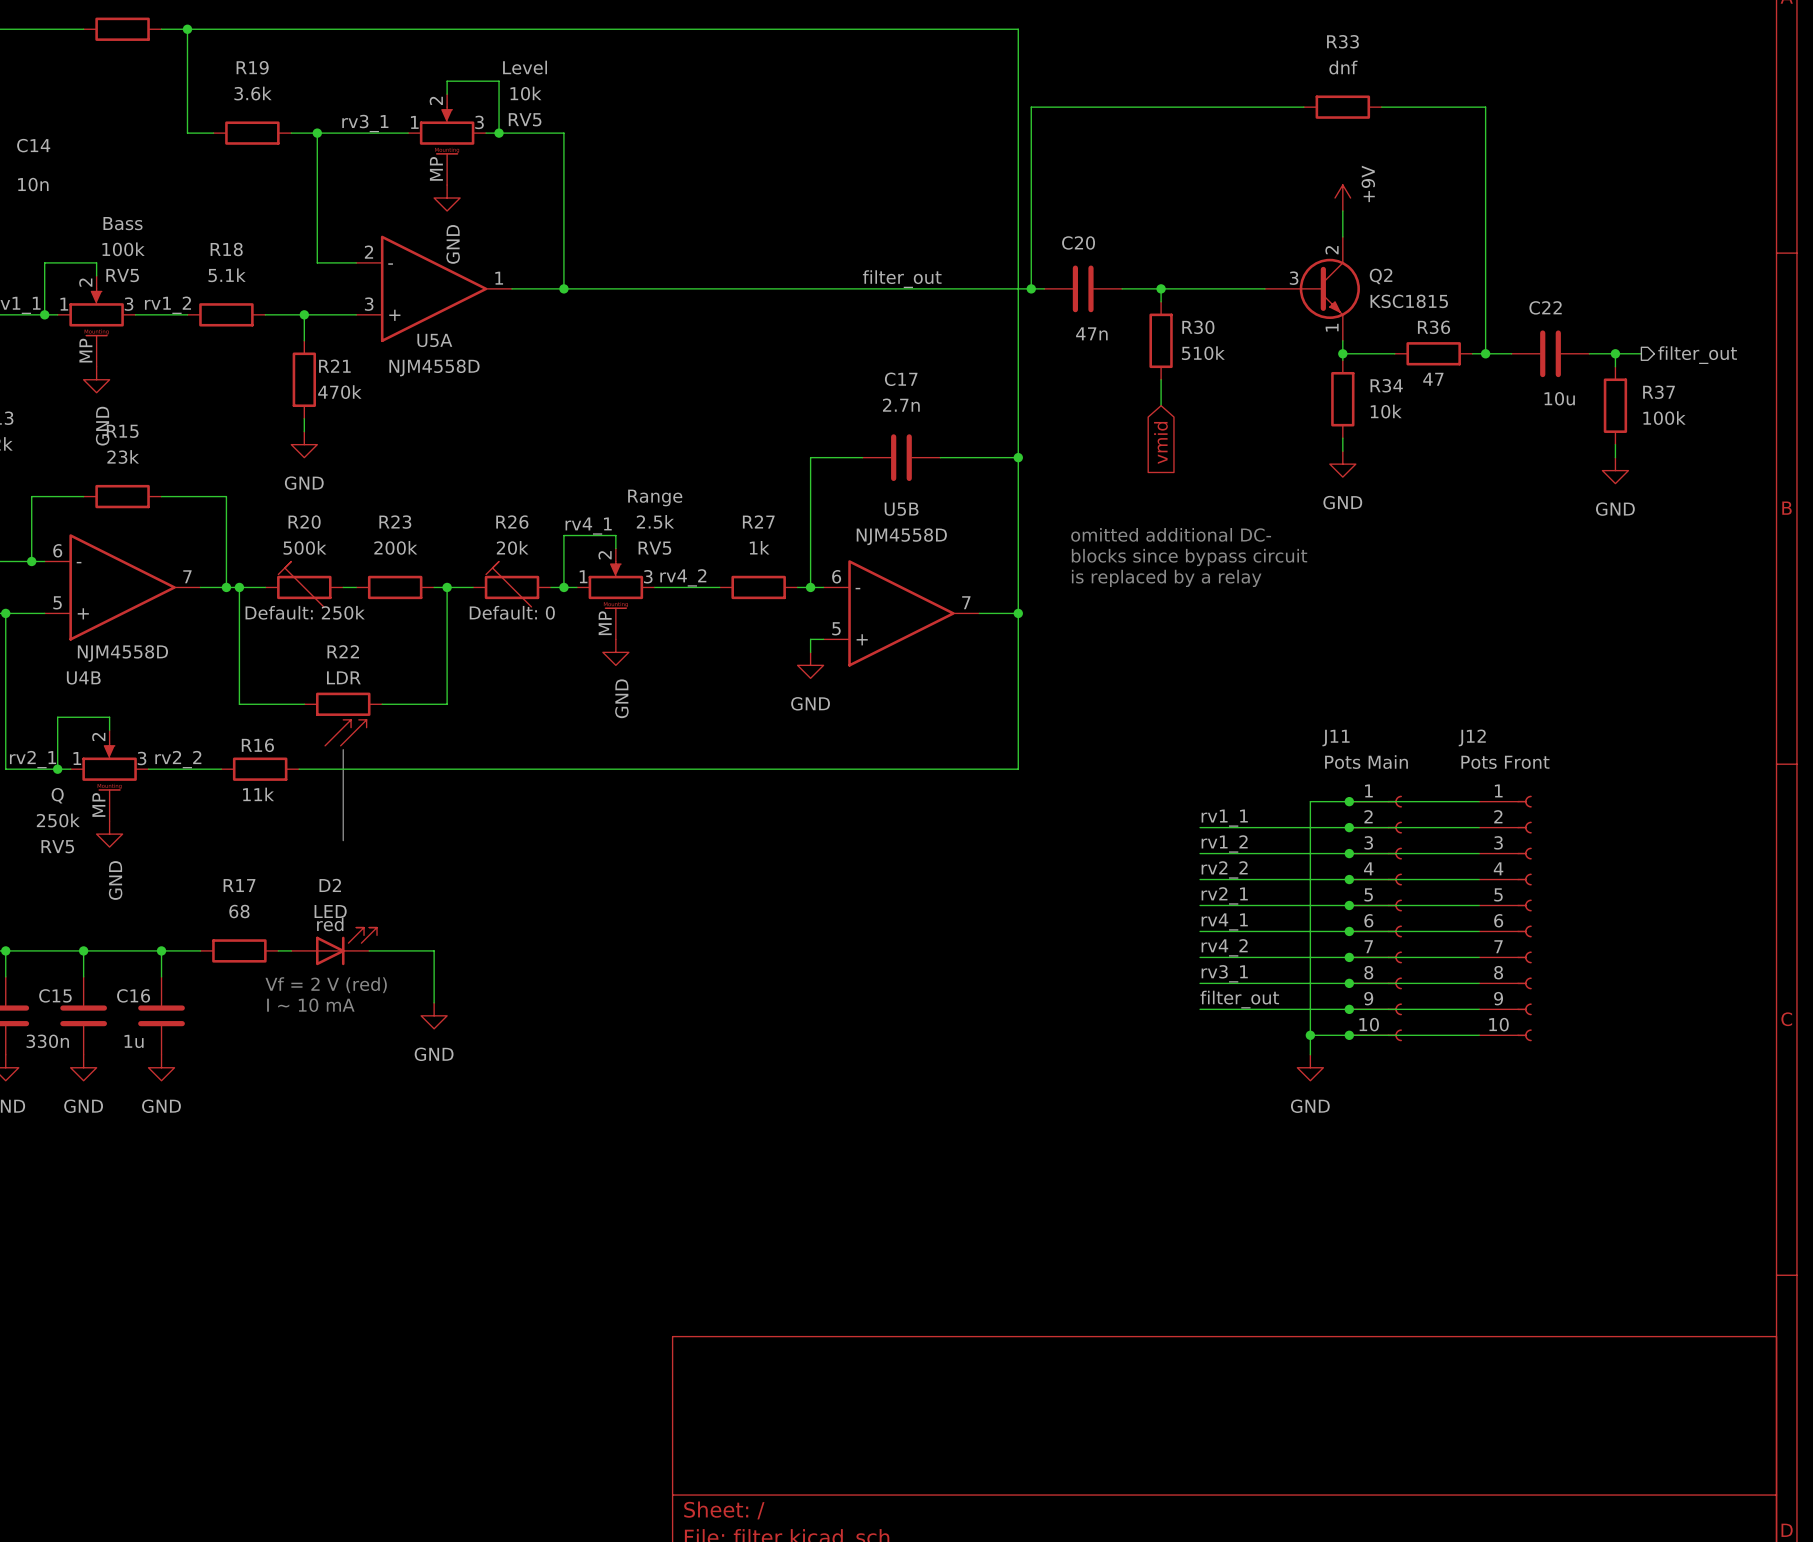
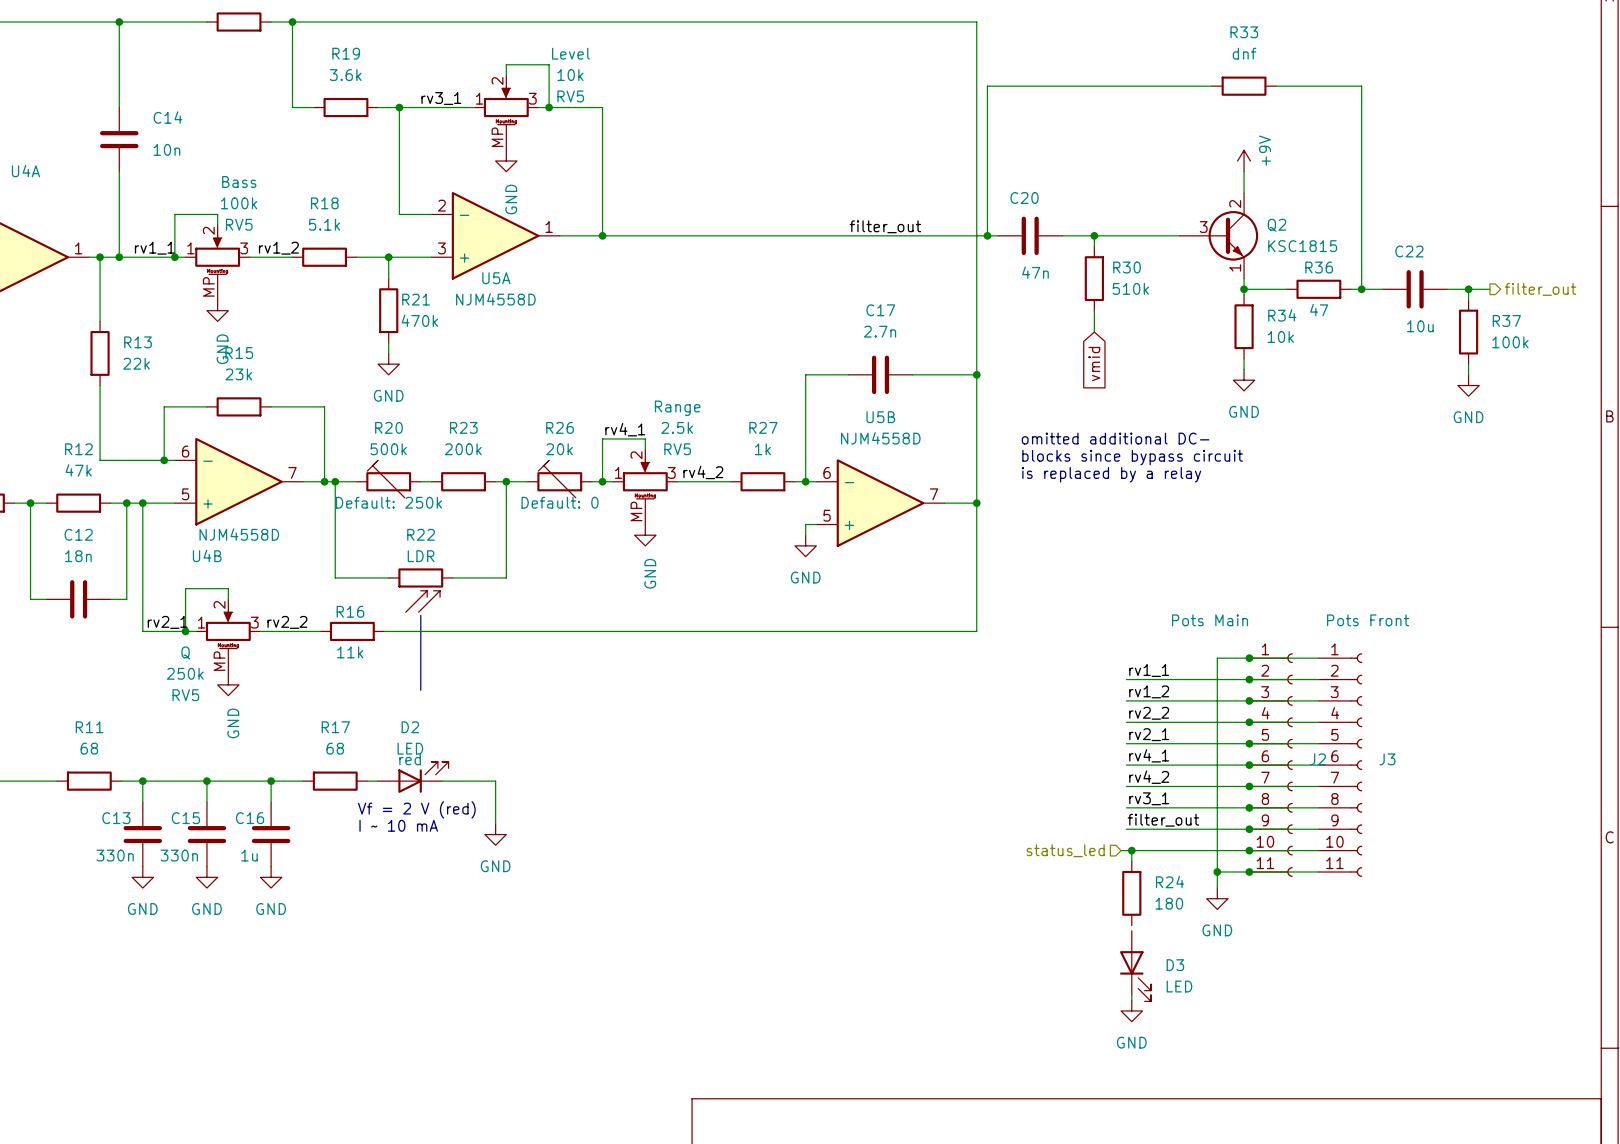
J11: Pots Main (1375, 918) -> none
J12: Pots Front (1505, 918) -> none
J2: none -> Pots Main (1271, 765)
J3: none -> Pots Front (1340, 765)
wire: none -> (1121, 850) (1217, 850)
wire: none -> (1131, 850) (1131, 861)
junction: none -> (1131, 850)
junction: (1310, 1035) -> none
hierarchical label: none -> status_led (1065, 850)
wire: none -> (1217, 872) (1318, 872)
junction: none -> (1217, 872)
junction: none -> (1249, 872)
power symbol position: GND (1310, 1067) -> GND (1217, 898)
R24: none -> 180 (1131, 893)
D3: none -> LED (1135, 966)
wire: none -> (1131, 994) (1131, 1000)
power symbol: none -> GND (1131, 1010)

